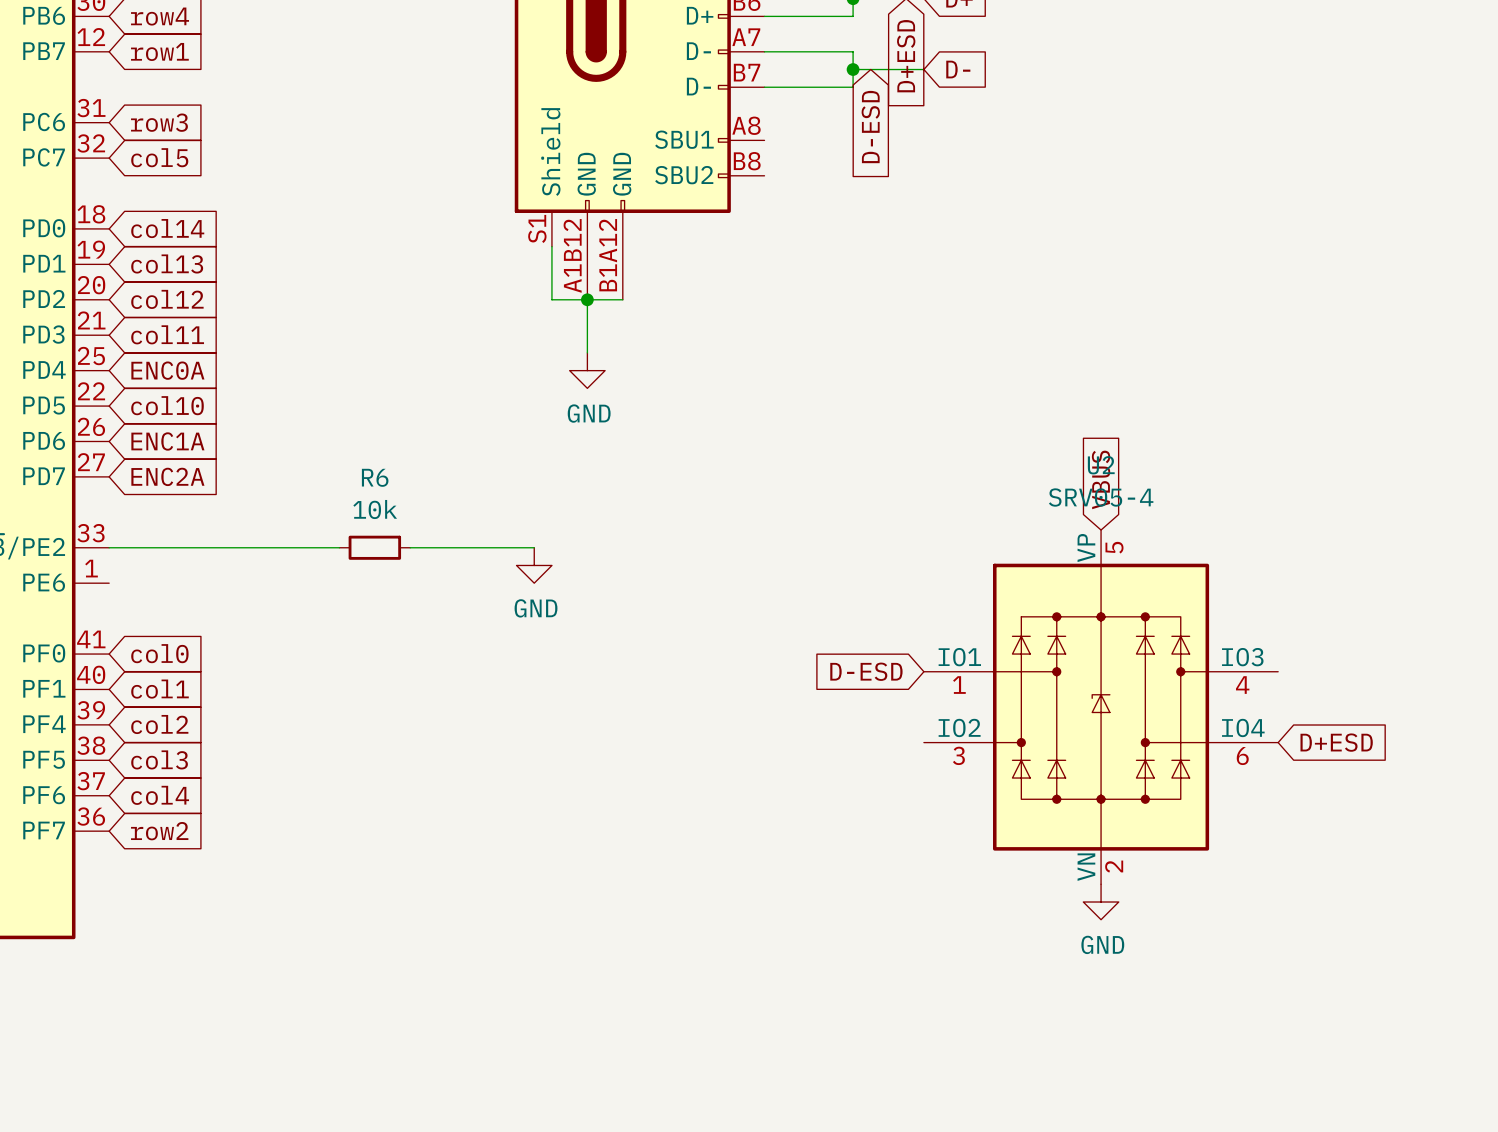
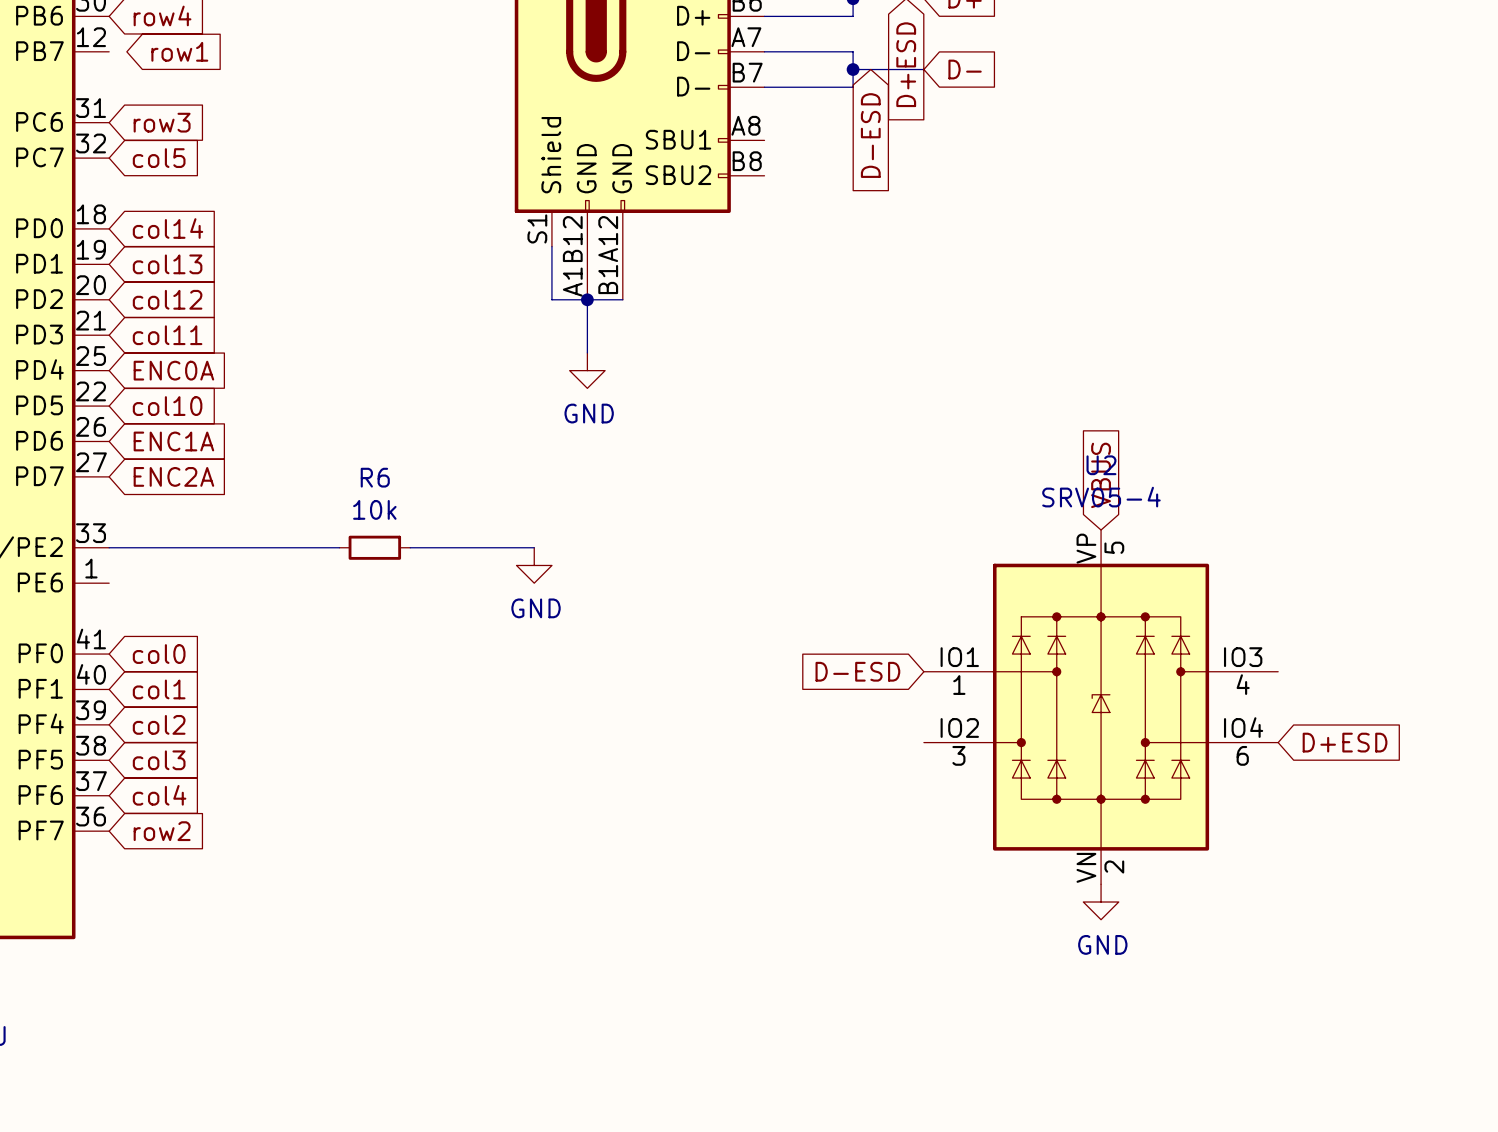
global label position: row1 (159, 51) -> row1 (179, 51)

